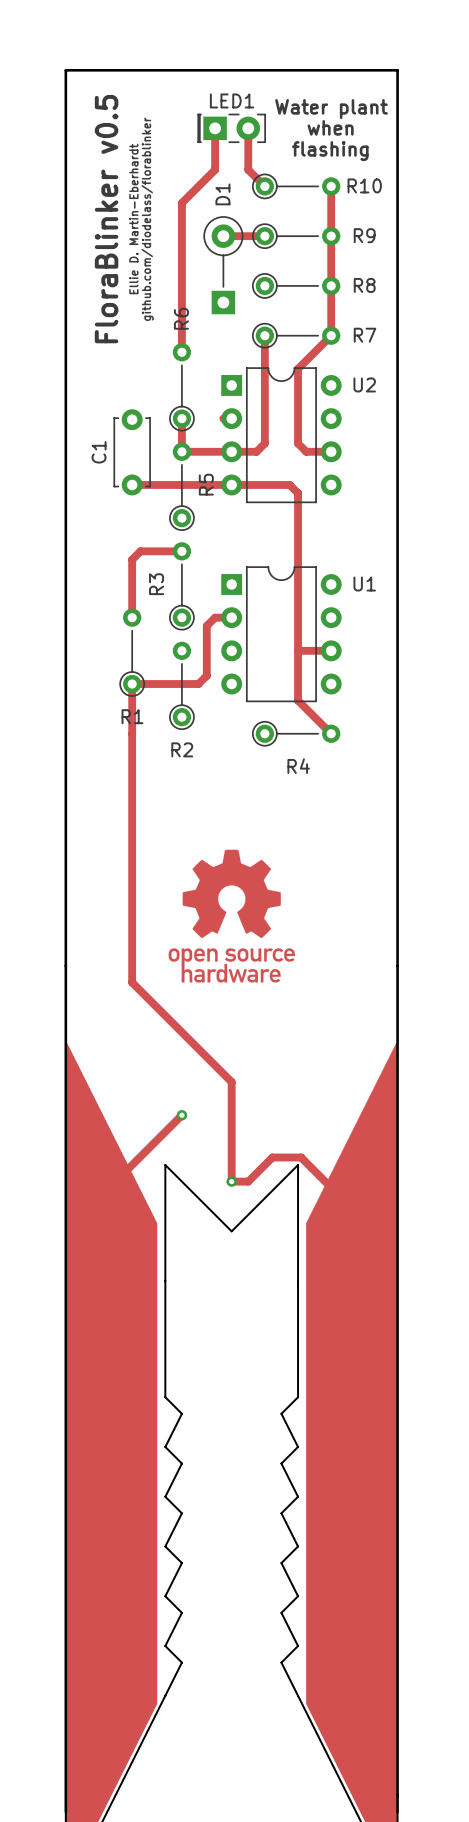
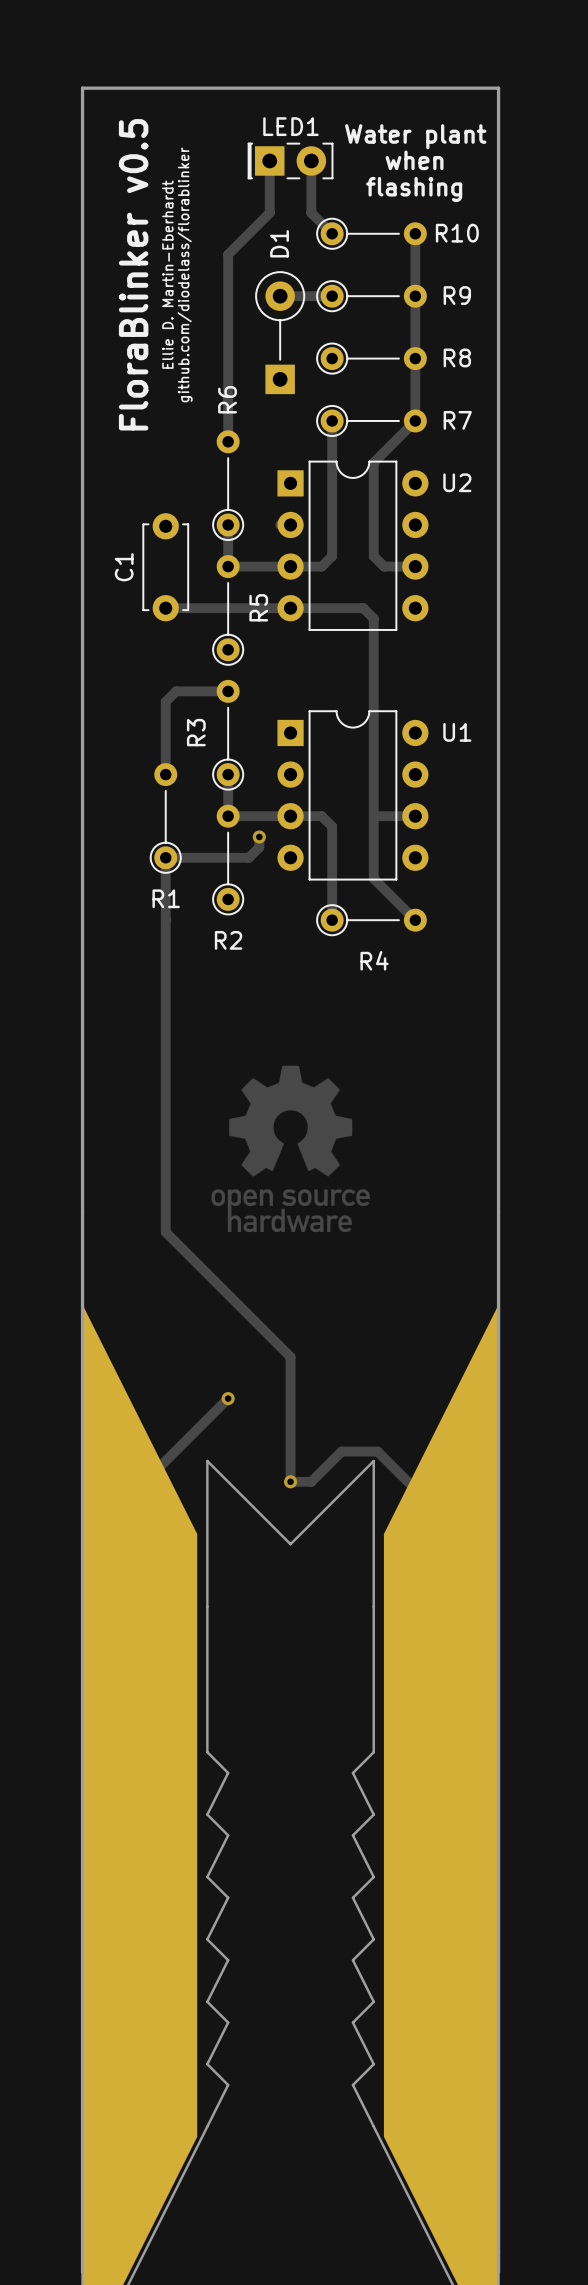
track: none -> (228, 774) (228, 816) (321, 816) (332, 826) (332, 920)
track: (231, 617) (215, 617) (206, 625) (206, 667) -> none
via: none -> (259, 836)

